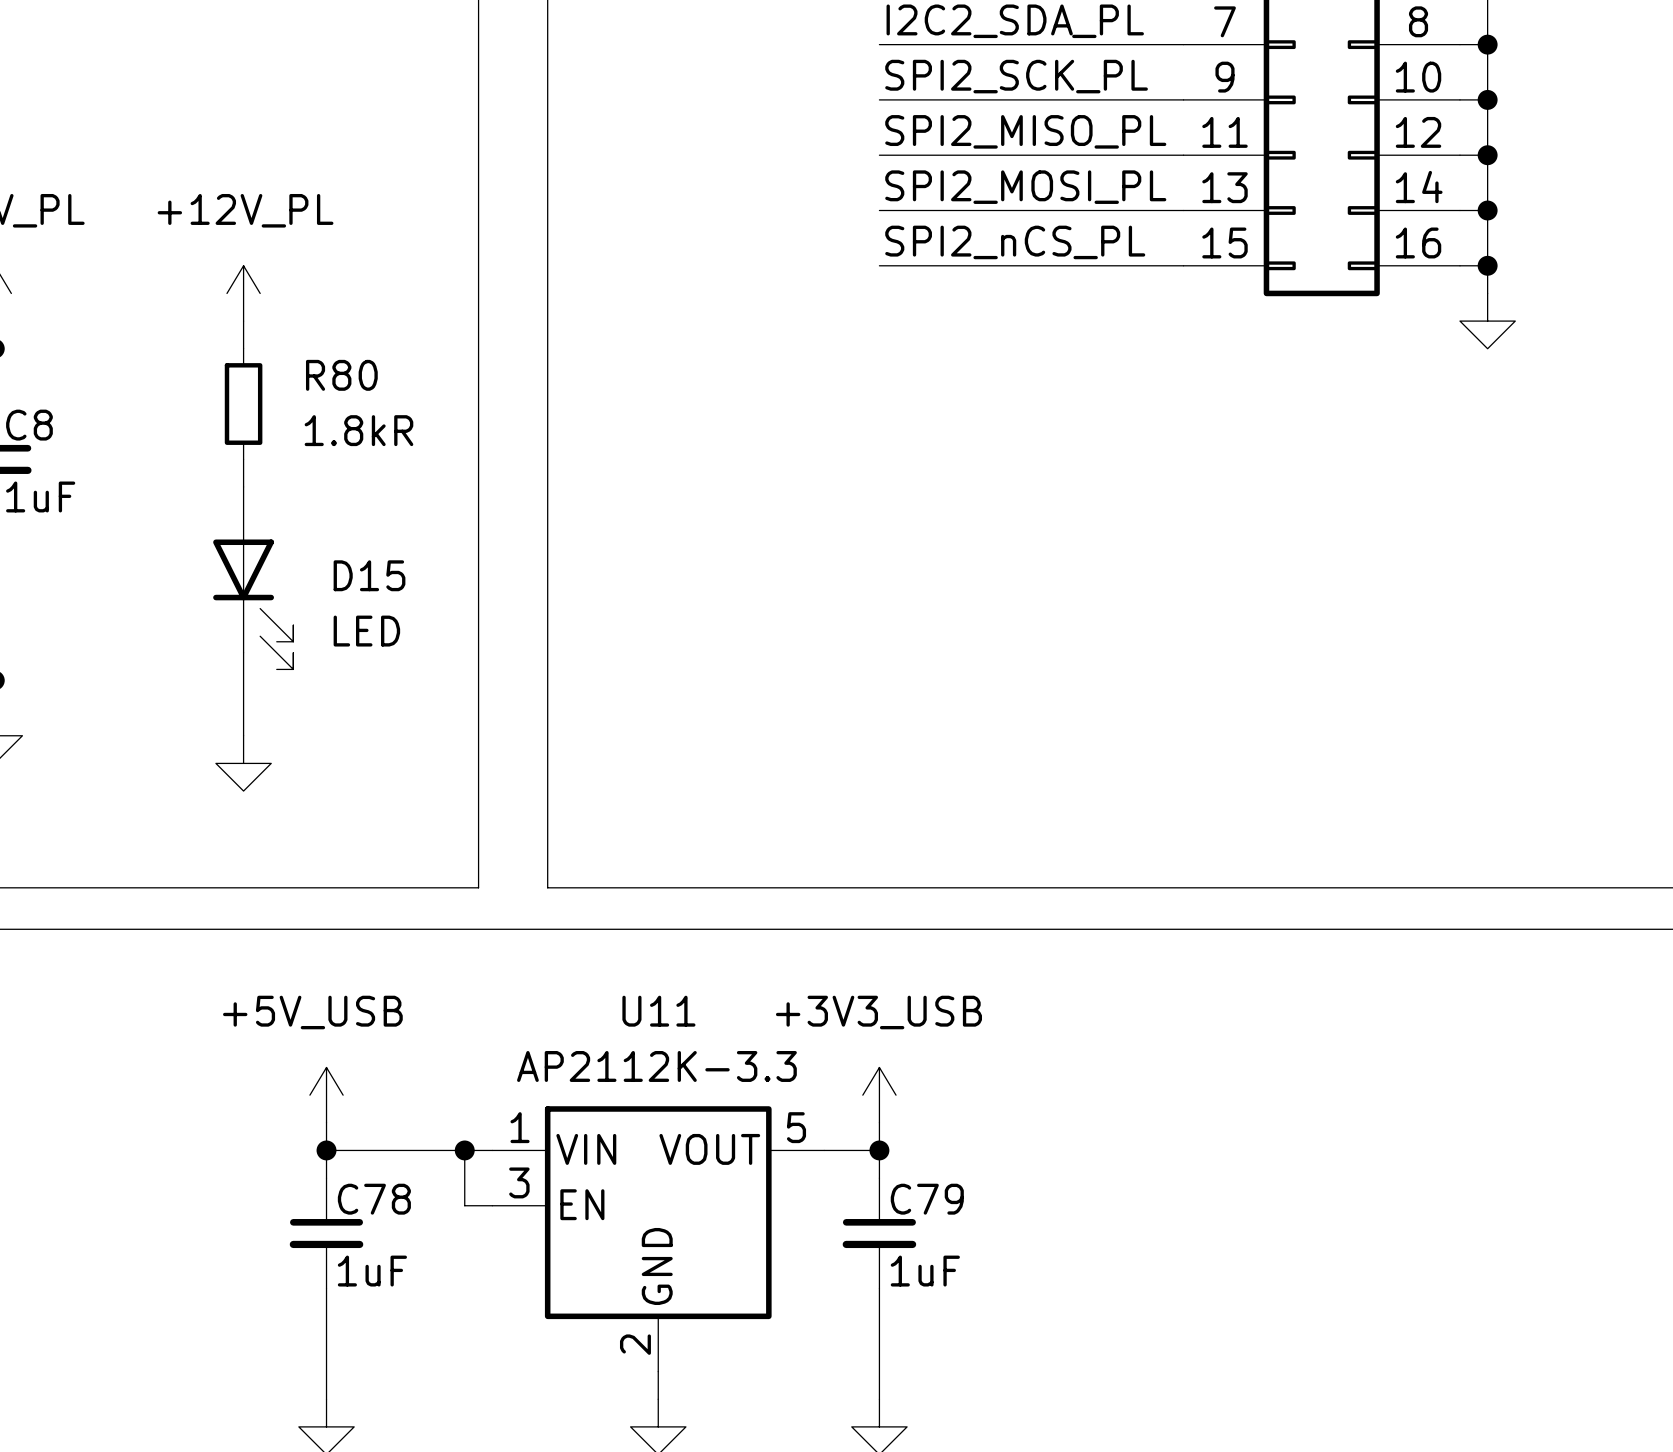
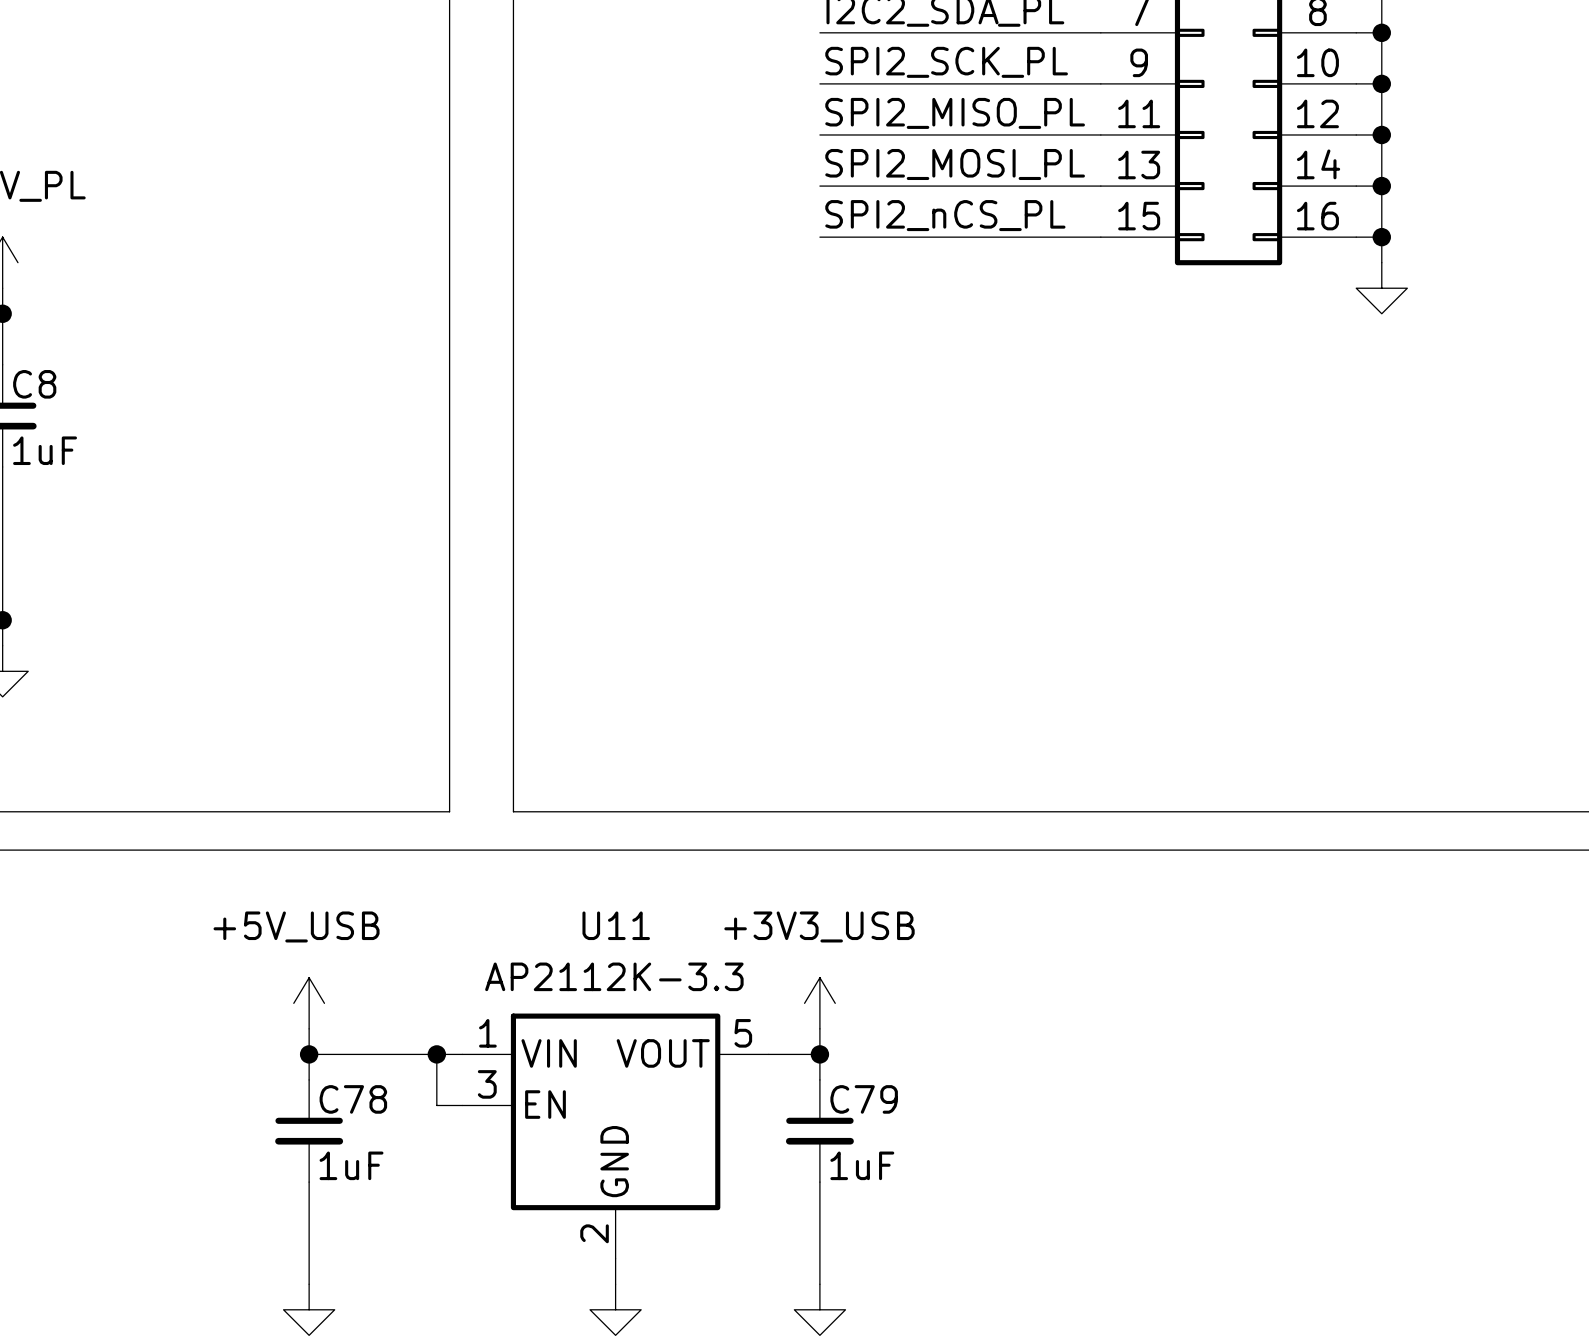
power symbol: +12V_PL (243, 293) -> none
wire: (243, 321) (243, 348) -> none
R80: 1.8kR (243, 404) -> none
wire: (243, 459) (243, 486) -> none
D15: LED (253, 578) -> none
wire: (243, 652) (243, 735) -> none
power symbol: (243, 763) -> none

